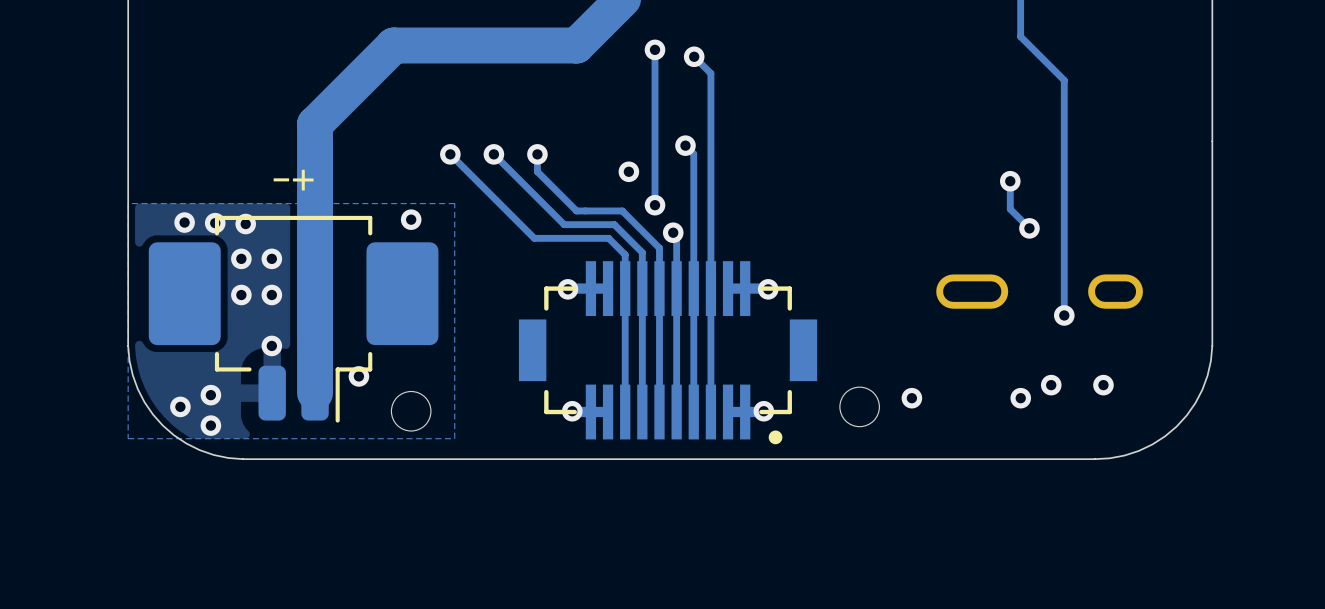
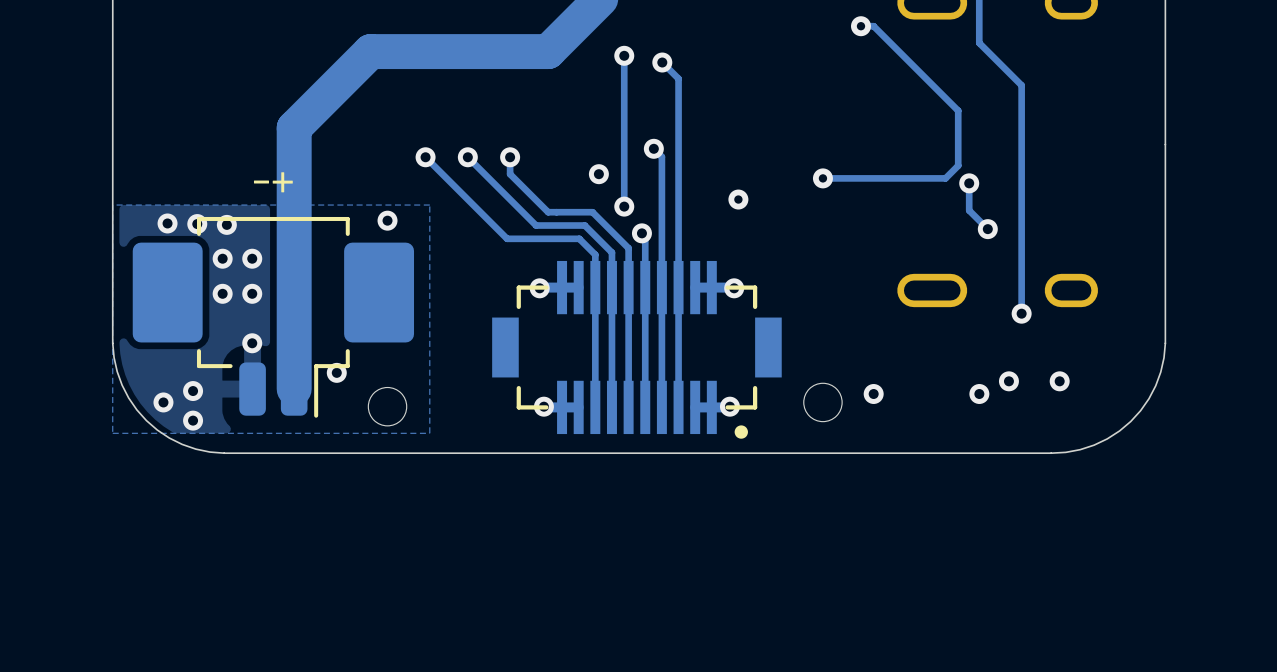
track: none -> (860, 26) (873, 26) (958, 110) (958, 165) (945, 178) (822, 178)
via: none -> (860, 26)
via: none -> (822, 178)
via: none -> (738, 199)

